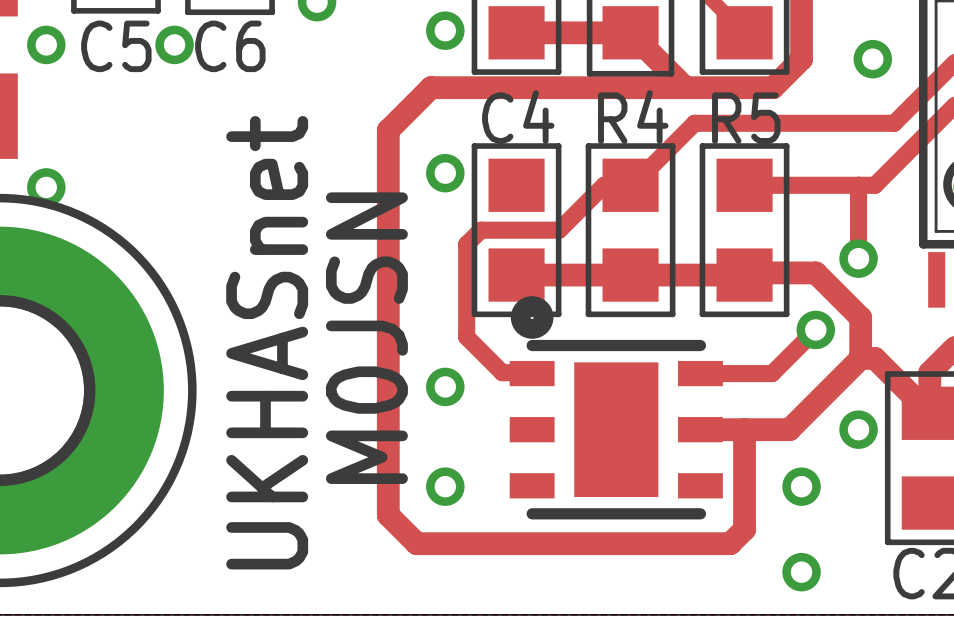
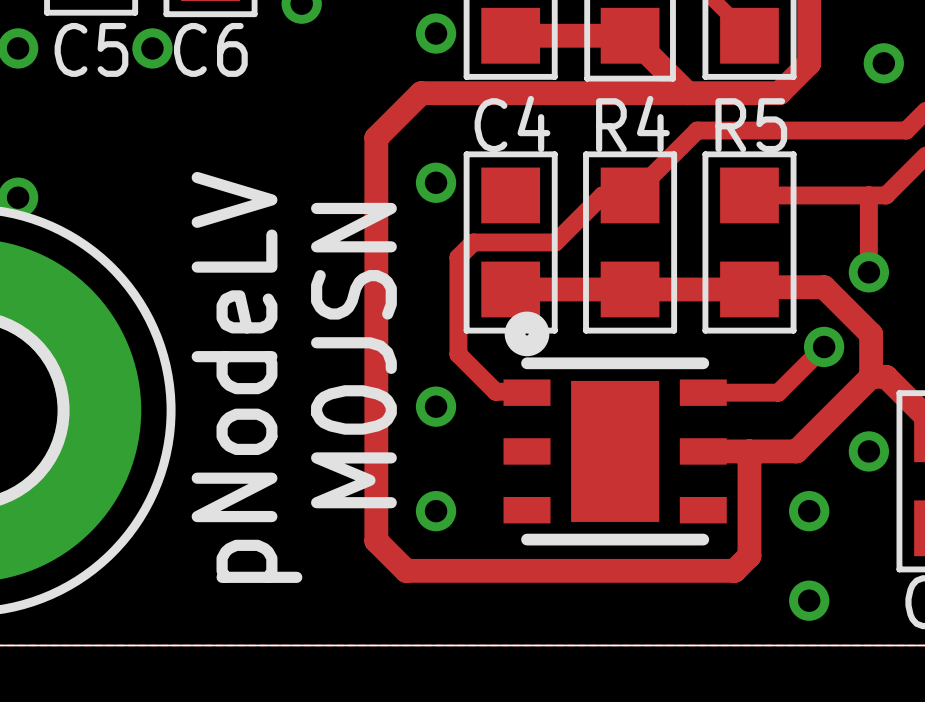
text: UKHASnet (267, 342) -> pNodeLV (246, 377)

